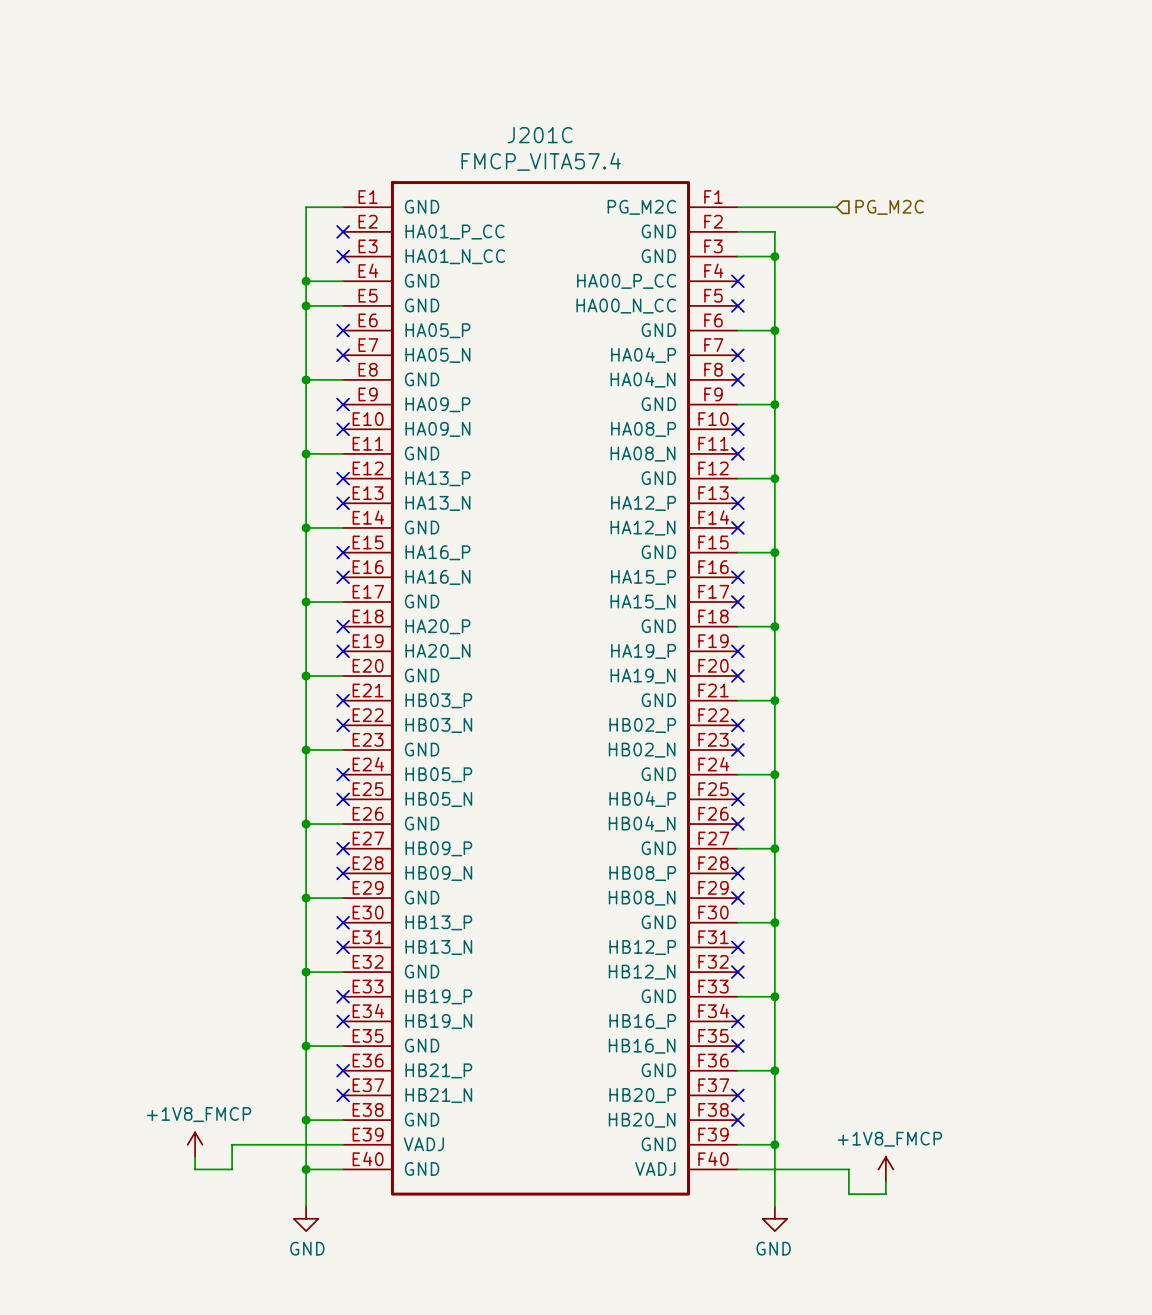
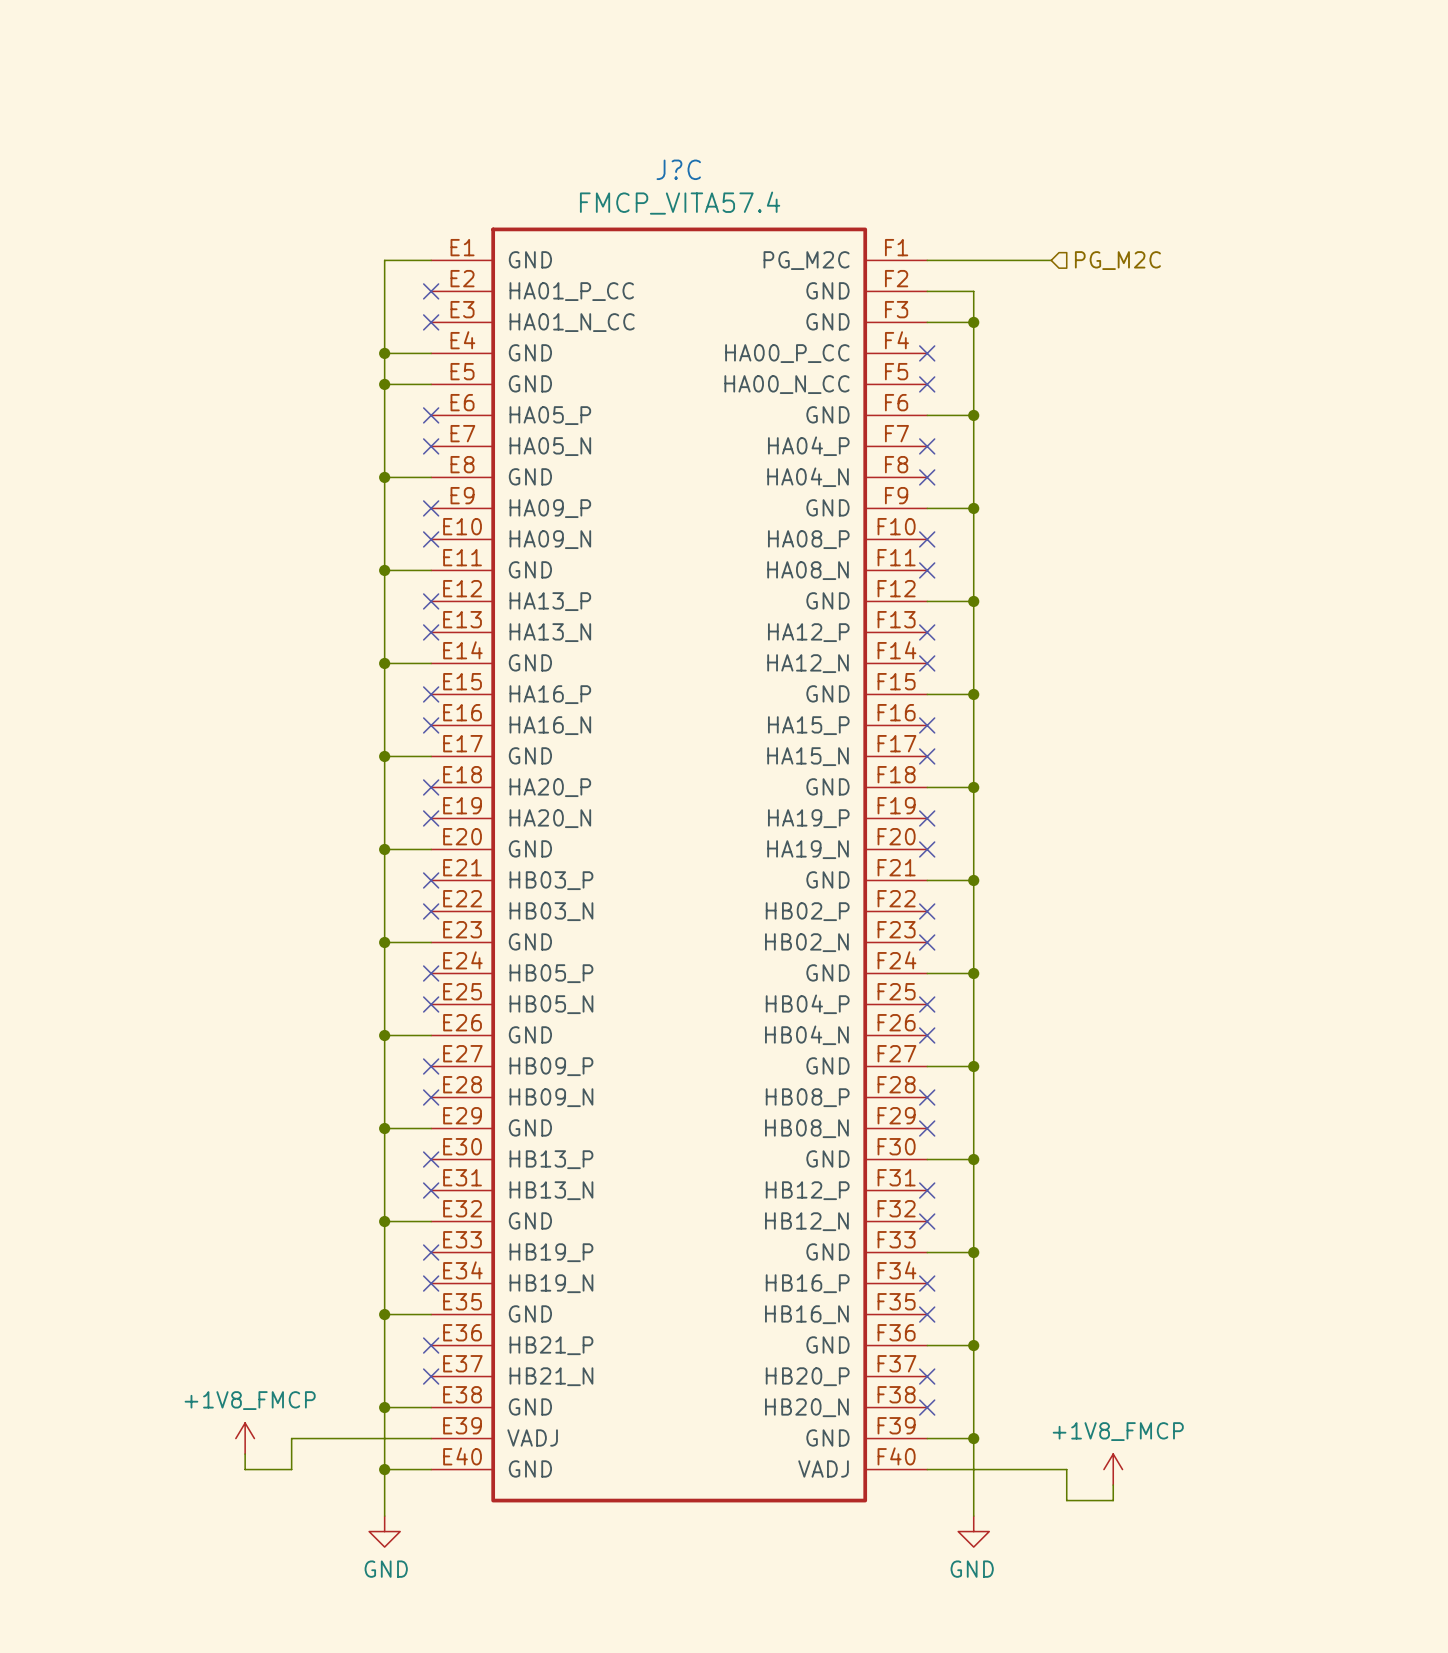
J201C name: J201C (540, 135) -> J?C (678, 169)

